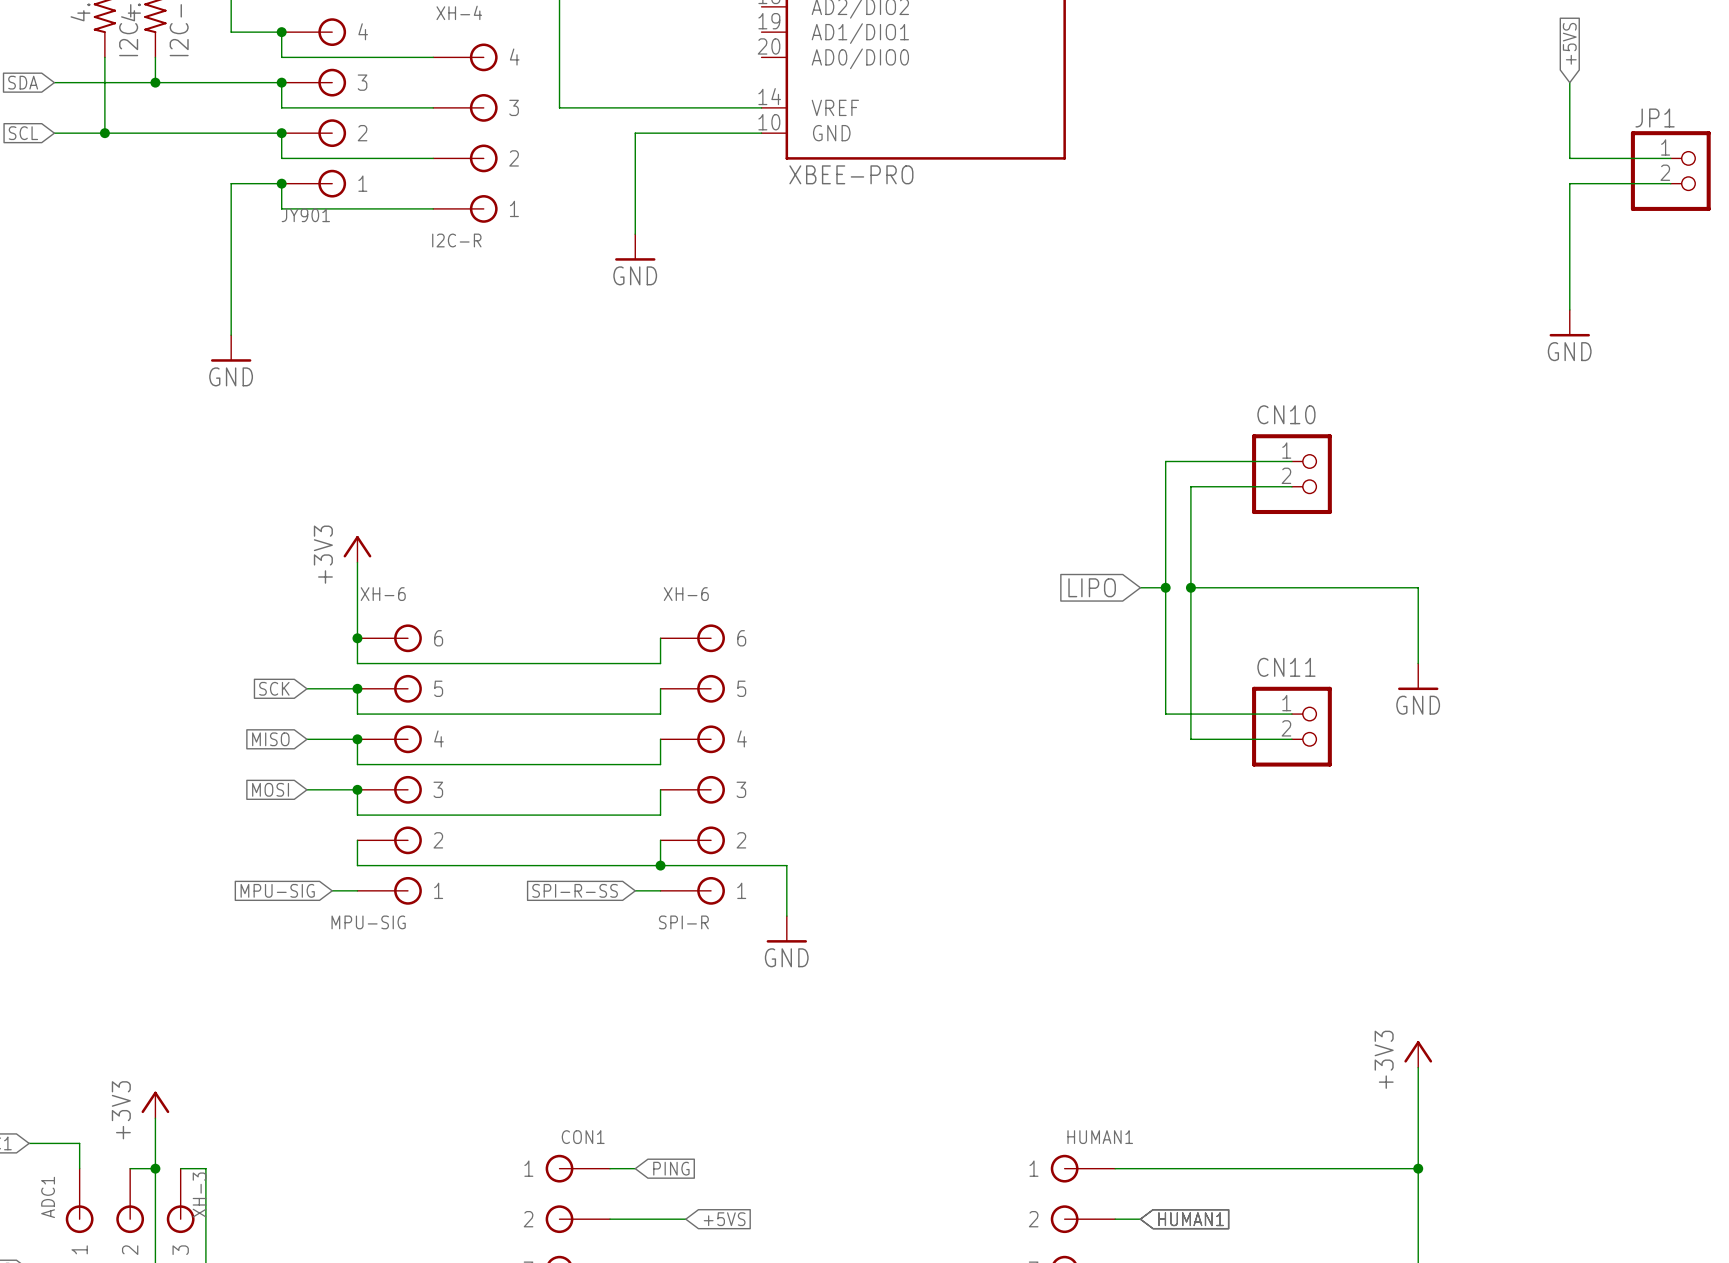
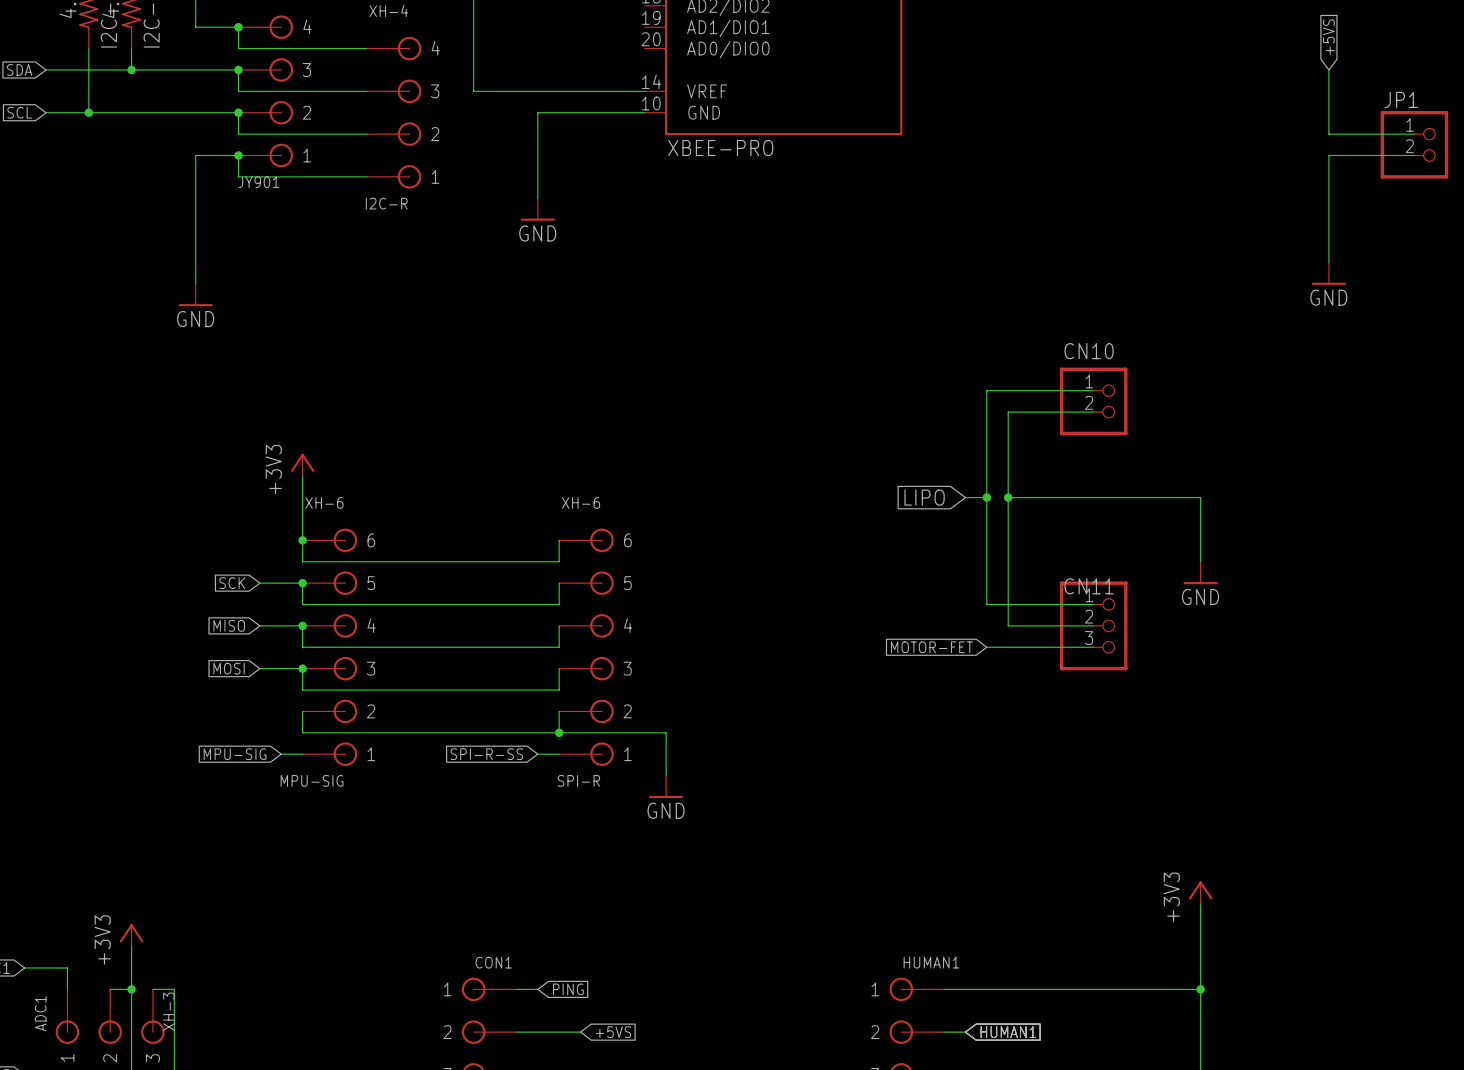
CN11 symbol: [1252, 686, 1332, 767] -> [1059, 581, 1128, 671]
global label: none -> MOTOR-FET (931, 647)
wire: none -> (986, 647) (1093, 647)

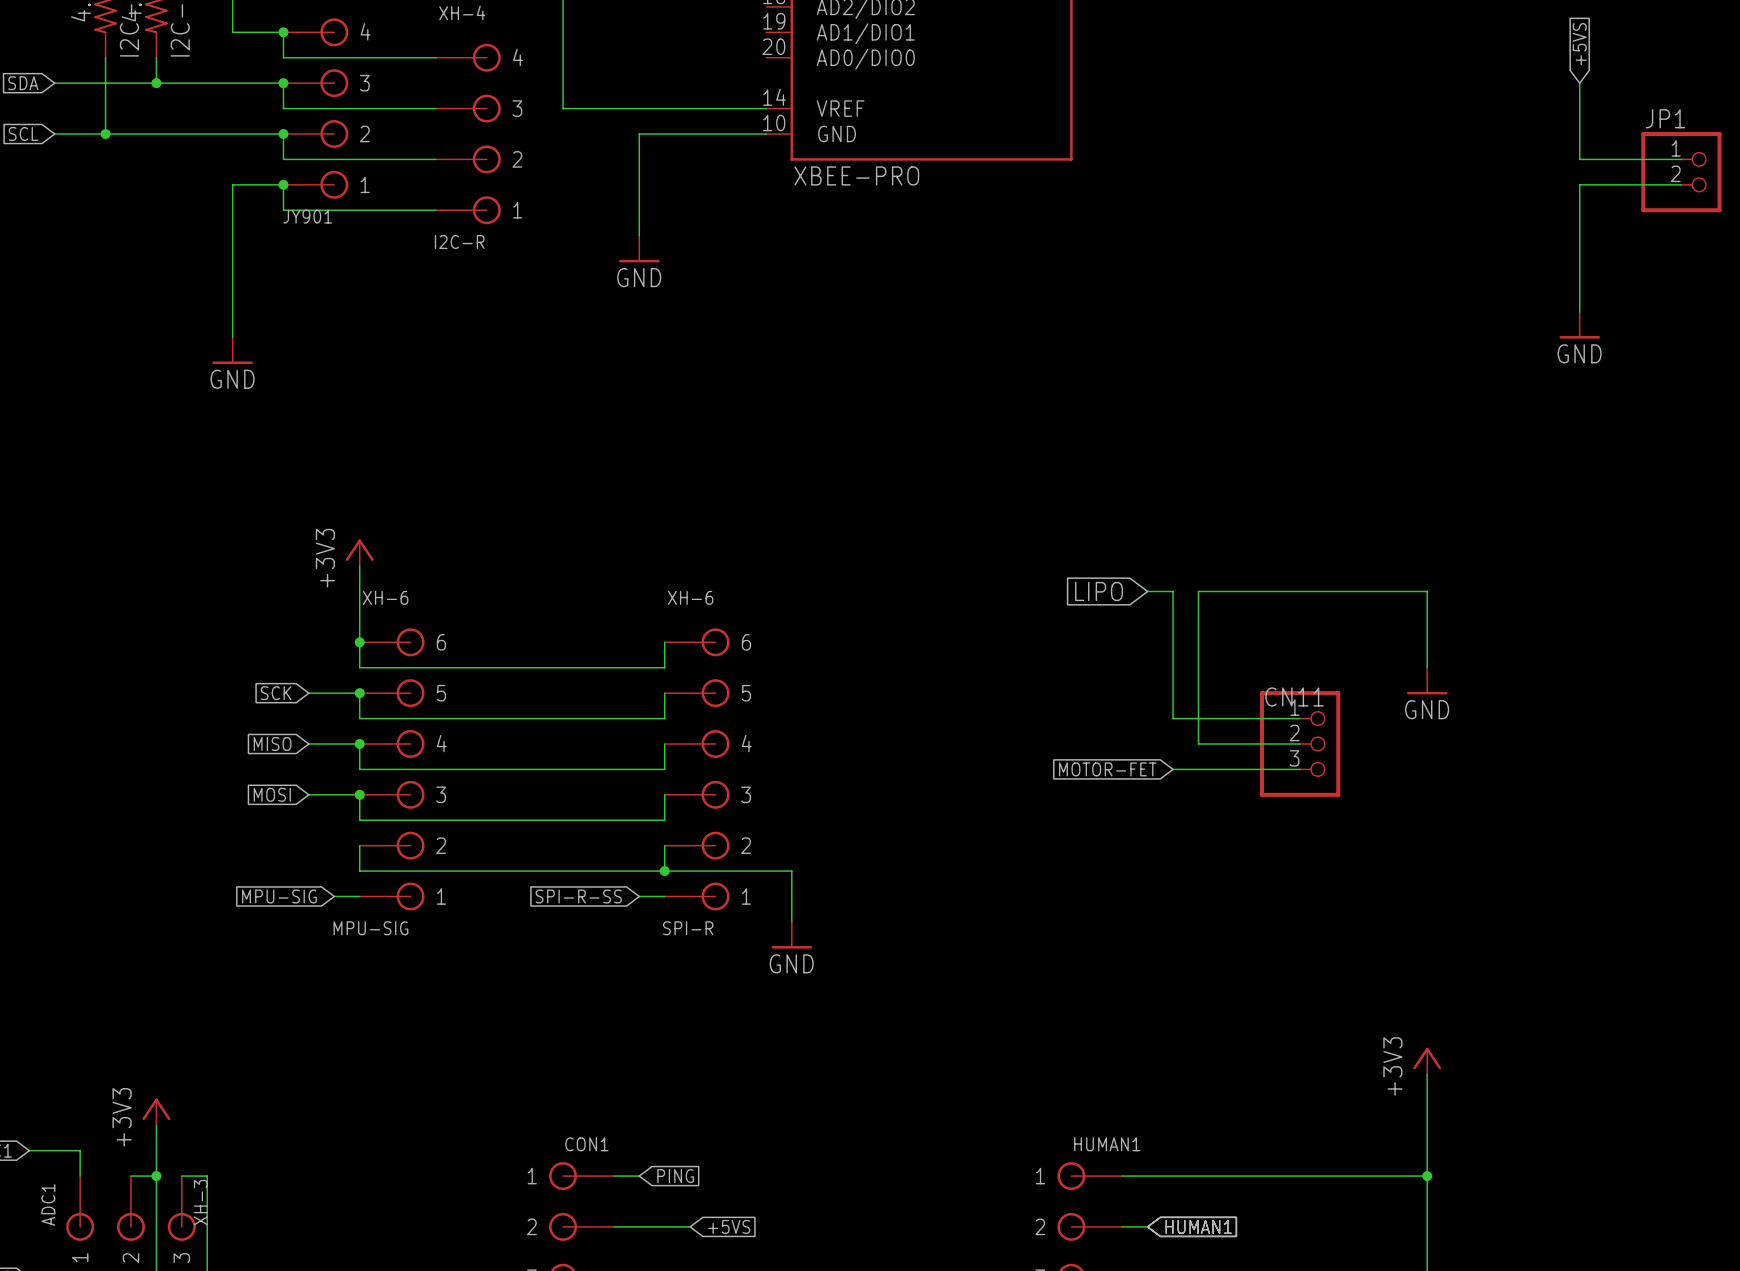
wire: (1093, 390) (986, 390) (986, 497) -> none
CN10: (1093, 401) -> none
wire: (1093, 412) (1008, 412) (1008, 497) -> none
junction: (986, 497) -> none
junction: (1008, 497) -> none

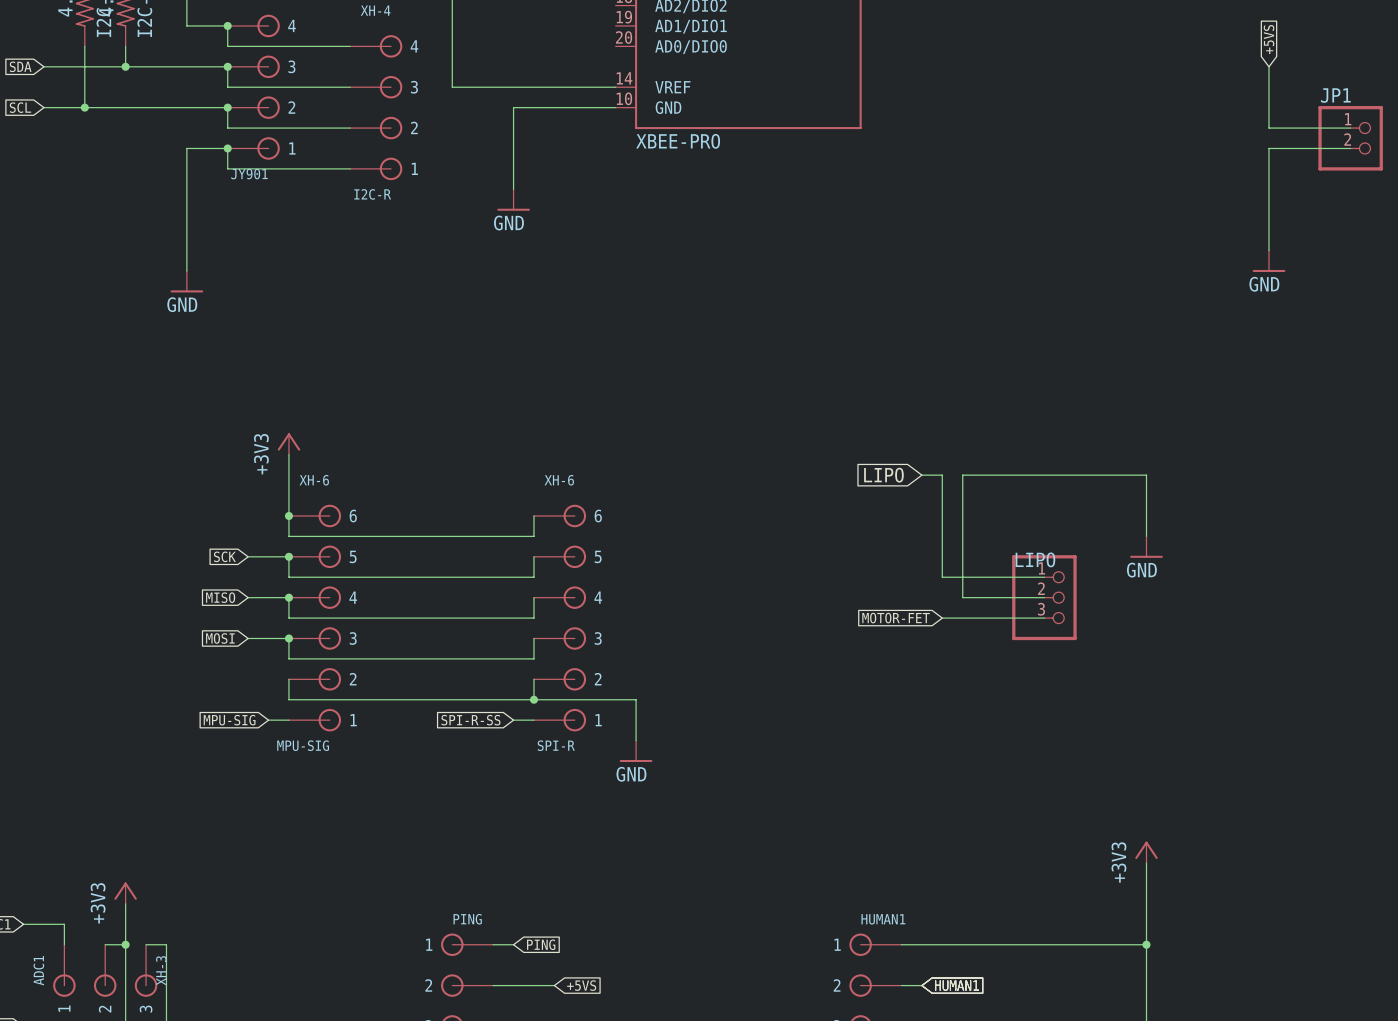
CN11 name: CN11 (1294, 696) -> LIPO (1035, 559)
CON1 name: CON1 (586, 1144) -> PING (467, 919)

